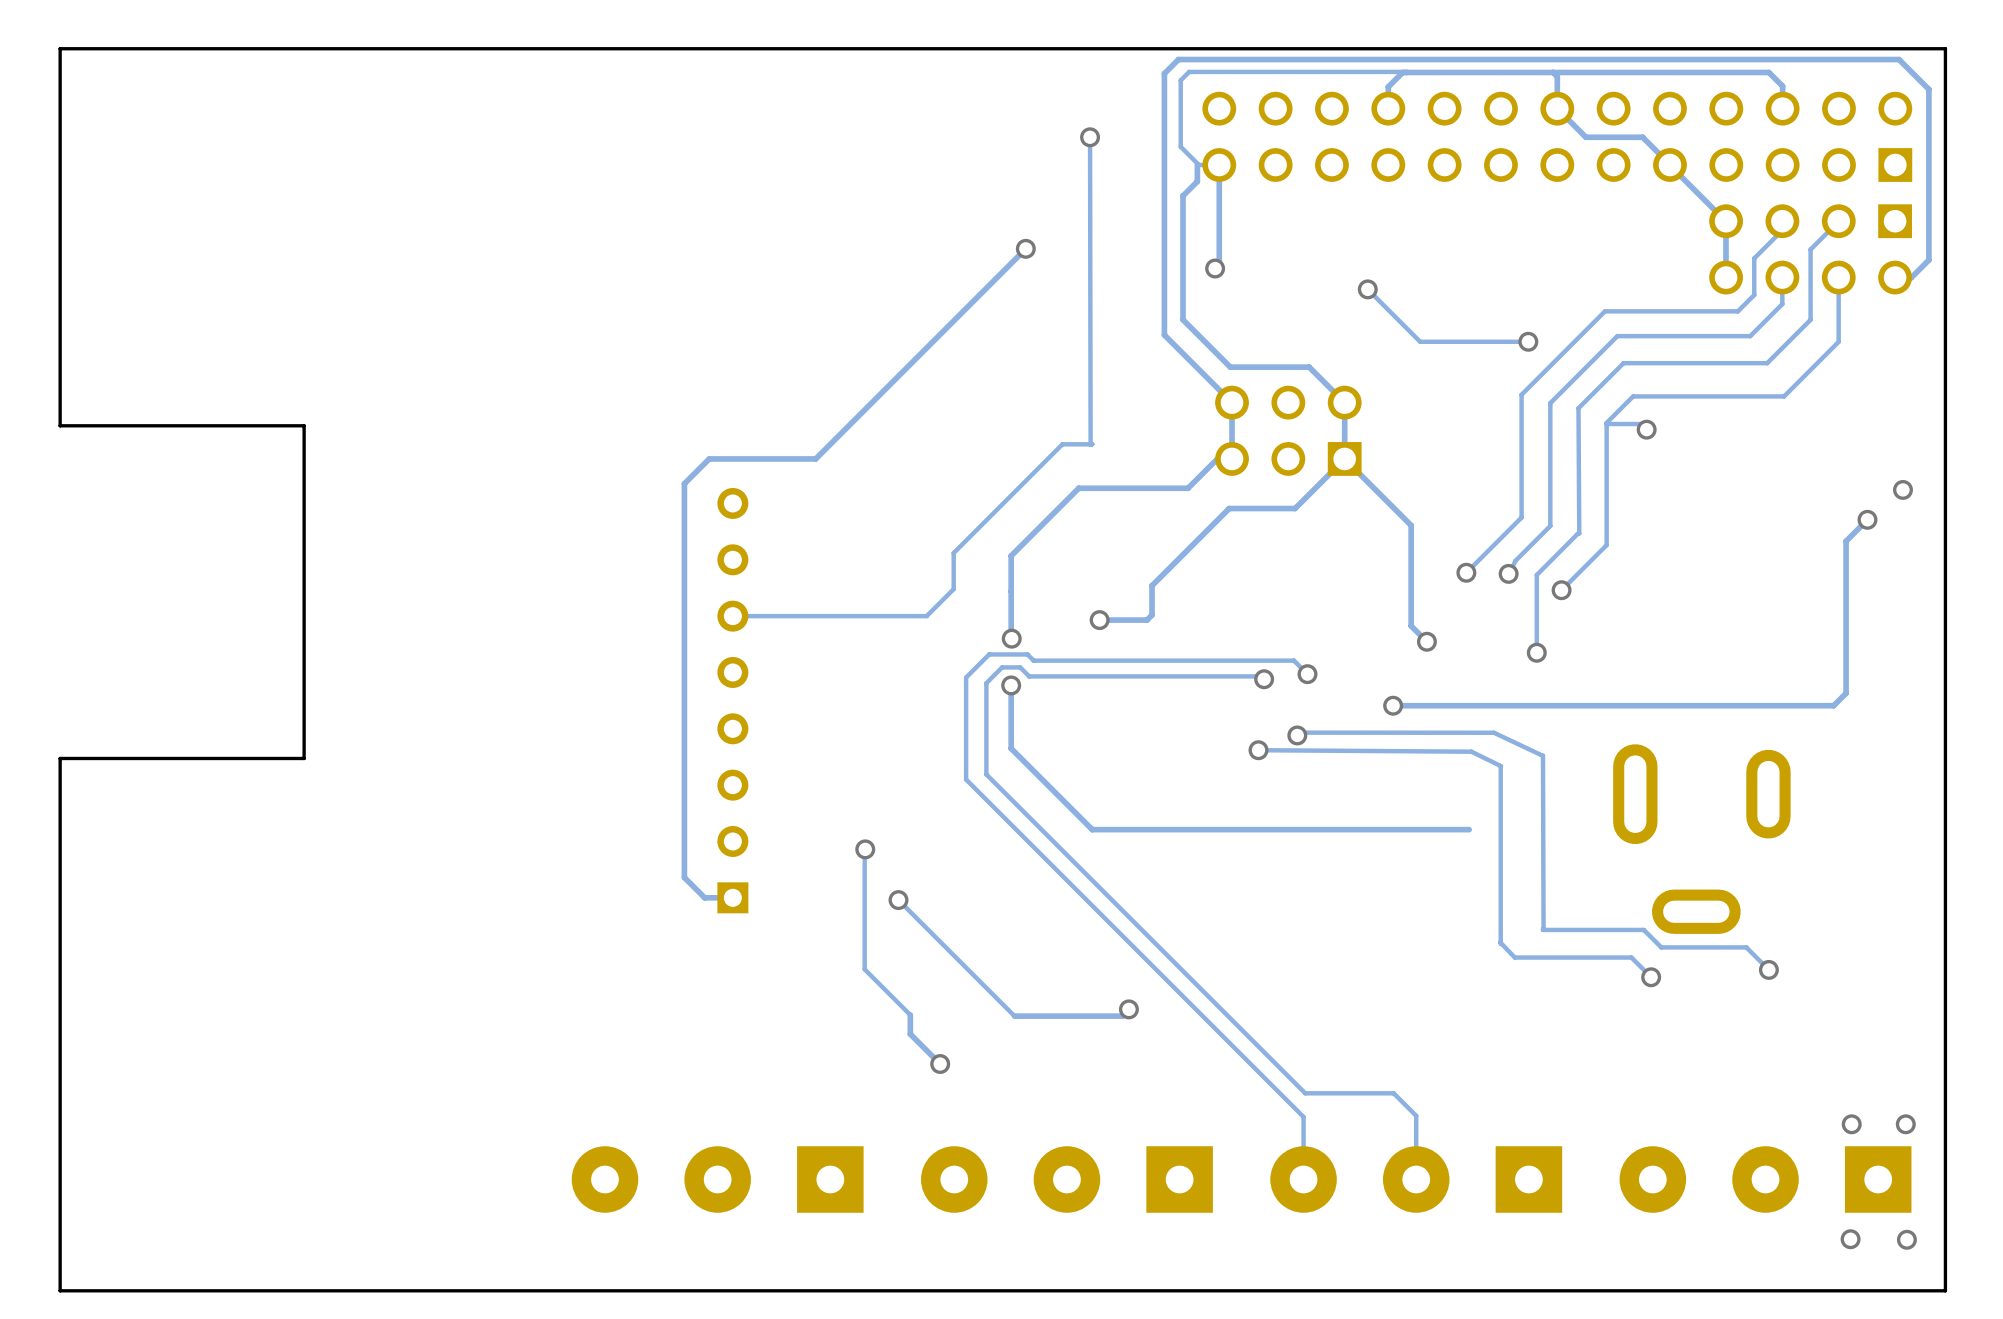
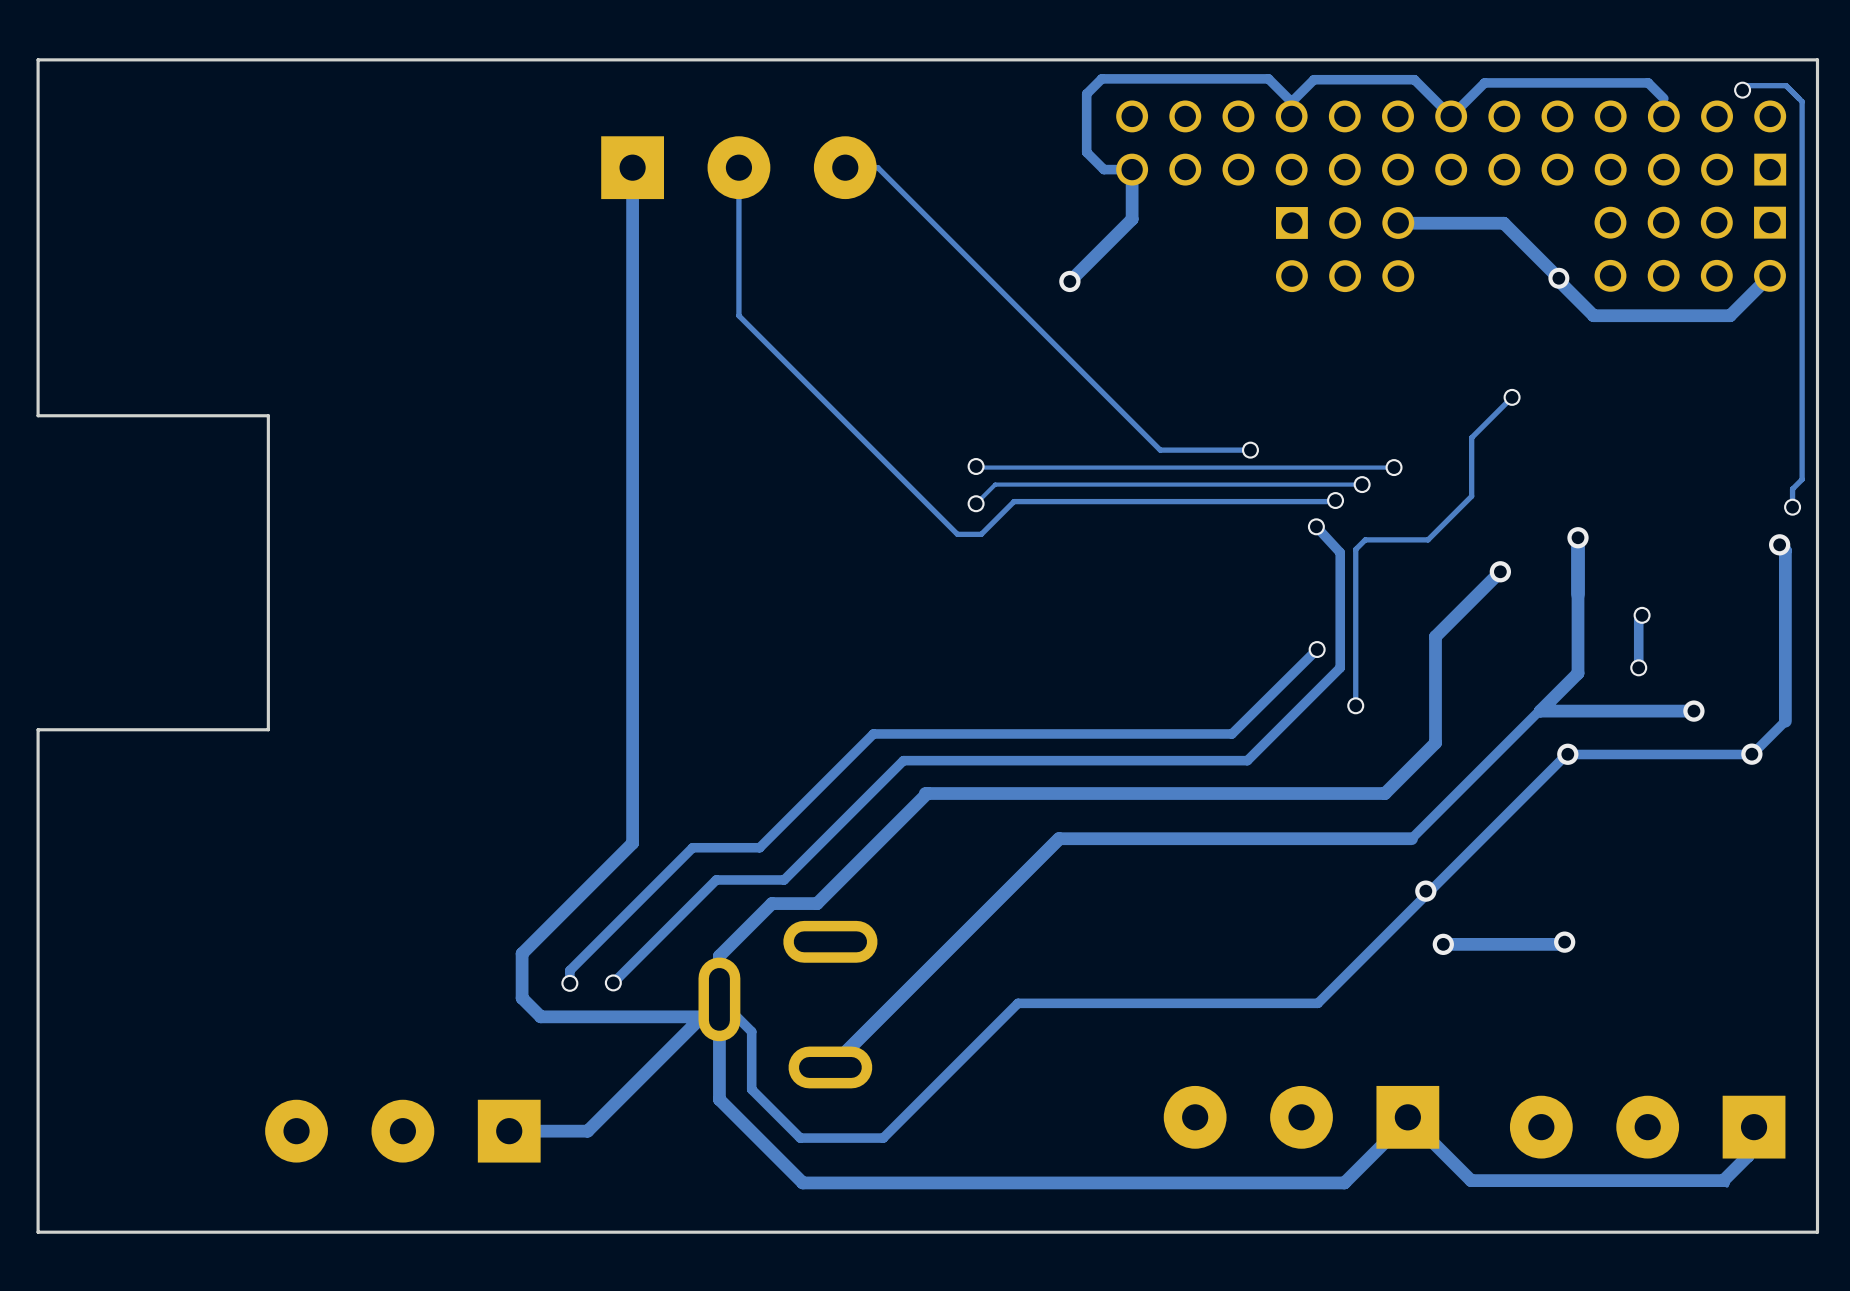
track: (1406, 72) (1189, 71) (1180, 80) (1180, 146) (1198, 165) -> none
track: (1553, 72) (1557, 76) (1557, 108) (1585, 137) (1642, 137) (1725, 221) (1725, 277) -> none
track: none -> (1742, 90) (1747, 85) (1786, 85) (1802, 101) (1802, 479) (1792, 489) (1792, 507)
via: none -> (1742, 90)
track: (1782, 89) (1782, 86) (1768, 72) (1402, 72) (1388, 86) (1388, 93) -> (1663, 98) (1648, 82) (1484, 82) (1451, 116) (1414, 79) (1313, 79) (1291, 102) (1268, 78) (1101, 78) (1086, 93) (1086, 152) (1103, 169) (1111, 169)
track: (1090, 137) (1090, 444) (1092, 444) (1062, 444) (953, 553) (953, 589) (926, 616) (732, 616) -> none
via: (1090, 137) -> none
track: none -> (632, 167) (632, 843) (522, 953) (522, 998) (540, 1016) (701, 1016)
track: none -> (738, 167) (738, 315) (957, 534) (981, 534) (1014, 501) (1335, 500)
part: none -> (738, 167)
track: none -> (845, 167) (877, 167) (1160, 450) (1250, 450)
track: (1197, 165) (1197, 181) (1183, 195) (1183, 319) (1230, 367) (1309, 367) (1344, 402) (1344, 458) -> none
track width: thin (1197, 165) (1219, 165) (1219, 217) -> thick (1111, 169) (1132, 169) (1132, 219)
track: (1219, 217) (1219, 264) (1215, 268) -> (1132, 219) (1069, 281)
track: none -> (1398, 223) (1503, 223) (1558, 278)
track: (1782, 221) (1782, 230) (1754, 258) (1754, 295) (1737, 311) (1604, 311) (1521, 394) (1521, 517) (1466, 572) -> none
track: (1838, 221) (1810, 249) (1810, 319) (1767, 363) (1623, 363) (1578, 408) (1579, 533) (1536, 575) (1536, 652) -> none
track: (1025, 248) (815, 458) (709, 458) (684, 483) (684, 877) (704, 897) (732, 897) -> none
via: (1025, 248) -> none
via: (1215, 268) -> none
track: (1782, 277) (1782, 304) (1750, 336) (1617, 336) (1550, 403) (1550, 526) (1515, 560) (1508, 573) -> none
track: (1838, 277) (1838, 341) (1784, 396) (1633, 396) (1606, 422) (1606, 545) (1561, 590) -> none
track: (1894, 277) (1911, 277) (1928, 260) (1928, 89) (1899, 59) (1178, 59) (1164, 73) (1164, 335) (1232, 402) (1232, 458) (1217, 458) (1188, 488) (1078, 488) (1011, 555) (1011, 638) -> (1769, 275) (1730, 315) (1593, 315) (1558, 280) (1558, 278)
via: none -> (1558, 278)
via: none -> (1069, 281)
track: (1367, 289) (1420, 341) (1528, 341) -> none
via: (1367, 289) -> none
via: (1528, 341) -> none
track: none -> (1512, 397) (1471, 437) (1471, 496) (1428, 539) (1365, 539) (1355, 549) (1355, 705)
via: none -> (1512, 397)
track: (1606, 424) (1641, 424) (1646, 429) -> none
via: (1646, 429) -> none
part rotation: 0° (1288, 430) -> 180° (1345, 249)
part position: (1288, 430) -> (1345, 249)
track: (1344, 458) (1411, 525) (1411, 626) (1426, 641) -> none
track: (1344, 458) (1295, 508) (1229, 508) (1152, 585) (1152, 615) (1146, 620) (1099, 620) -> none
via: none -> (1250, 450)
track: none -> (976, 466) (1394, 467)
via: none -> (976, 466)
via: none -> (1394, 467)
via: (1902, 489) -> none
track: none -> (1362, 484) (995, 484) (976, 503)
via: none -> (1362, 484)
via: none -> (1335, 500)
via: none -> (976, 503)
track: (1867, 519) (1846, 541) (1846, 693) (1833, 705) (1393, 705) -> none
via: (1867, 519) -> none
via: none -> (1792, 507)
track: none -> (1316, 526) (1340, 552) (1340, 667) (1247, 760) (903, 760) (784, 879) (716, 879) (613, 982)
via: none -> (1316, 526)
via: none -> (1578, 537)
track: none -> (1781, 543) (1779, 544) (1785, 550) (1785, 721) (1752, 754) (1568, 754)
via: none -> (1779, 544)
via: (1466, 572) -> none
via: (1508, 573) -> none
via: (1561, 590) -> none
track: none -> (1500, 571) (1435, 636) (1435, 743) (1384, 793) (925, 793)
via: none -> (1500, 571)
track: none -> (1578, 595) (1578, 537) (1578, 673) (1540, 711) (1693, 711)
via: (1099, 620) -> none
track: none -> (1642, 615) (1638, 618) (1638, 667)
via: none -> (1642, 615)
via: (1011, 638) -> none
via: (1426, 641) -> none
via: (1536, 652) -> none
track: none -> (1317, 649) (1231, 733) (873, 733) (759, 847) (692, 847) (569, 970) (569, 983)
via: none -> (1317, 649)
track: (1307, 674) (1293, 660) (1033, 660) (1027, 654) (989, 654) (966, 677) (966, 779) (1303, 1116) (1303, 1179) -> none
via: (1307, 674) -> none
track: (1264, 679) (1255, 676) (1029, 676) (1020, 667) (1002, 667) (986, 683) (986, 774) (1305, 1093) (1393, 1093) (1416, 1115) (1416, 1179) -> none
via: (1264, 679) -> none
track: (1011, 685) (1011, 748) (1092, 829) (1469, 829) -> none
via: (1011, 685) -> none
via: none -> (1638, 667)
part: (732, 700) -> none
via: (1393, 705) -> none
via: none -> (1355, 705)
track: (1297, 735) (1300, 732) (1300, 731) (1298, 732) (1493, 732) (1542, 755) (1543, 928) -> none
via: (1297, 735) -> none
track: none -> (1693, 711) (1539, 711) (1411, 838) (1059, 838)
via: none -> (1693, 711)
track: (1258, 750) (1471, 751) (1500, 765) (1500, 944) -> none
via: (1258, 750) -> none
track: none -> (1567, 754) (1317, 1003) (1017, 1003) (883, 1138) (800, 1138) (751, 1089) (751, 1031) (719, 999) (587, 1131) (509, 1131)
via: none -> (1567, 754)
via: none -> (1751, 754)
track: none -> (927, 793) (817, 903) (771, 903) (719, 956) (719, 1099) (802, 1182) (1344, 1182) (1407, 1119) (1407, 1117) (1471, 1180) (1723, 1180) (1748, 1155) (1748, 1117)
part: (1701, 839) -> none
track: (865, 849) (864, 969) (910, 1015) -> none
via: (865, 849) -> none
track: none -> (1059, 838) (830, 1067) (1059, 838)
track: (898, 900) (1014, 1016) (1122, 1016) (1128, 1009) -> none
via: (898, 900) -> none
track: (1542, 928) (1643, 929) (1661, 947) (1746, 947) (1768, 969) -> none
via: none -> (1425, 891)
track: (1500, 942) (1514, 957) (1631, 957) (1651, 977) -> none
via: (1768, 969) -> none
via: (1651, 977) -> none
track: none -> (1564, 942) (1562, 944) (1443, 944)
via: none -> (1564, 942)
via: none -> (1443, 944)
via: (1128, 1009) -> none
track: (910, 1015) (910, 1034) (940, 1064) -> none
via: none -> (613, 982)
via: none -> (569, 983)
part: none -> (788, 1004)
via: (940, 1064) -> none
via: (1851, 1124) -> none
via: (1905, 1124) -> none
part position: (717, 1179) -> (402, 1131)
part: (1066, 1179) -> none
part position: (1416, 1179) -> (1301, 1117)
via: (1850, 1239) -> none
via: (1906, 1239) -> none

